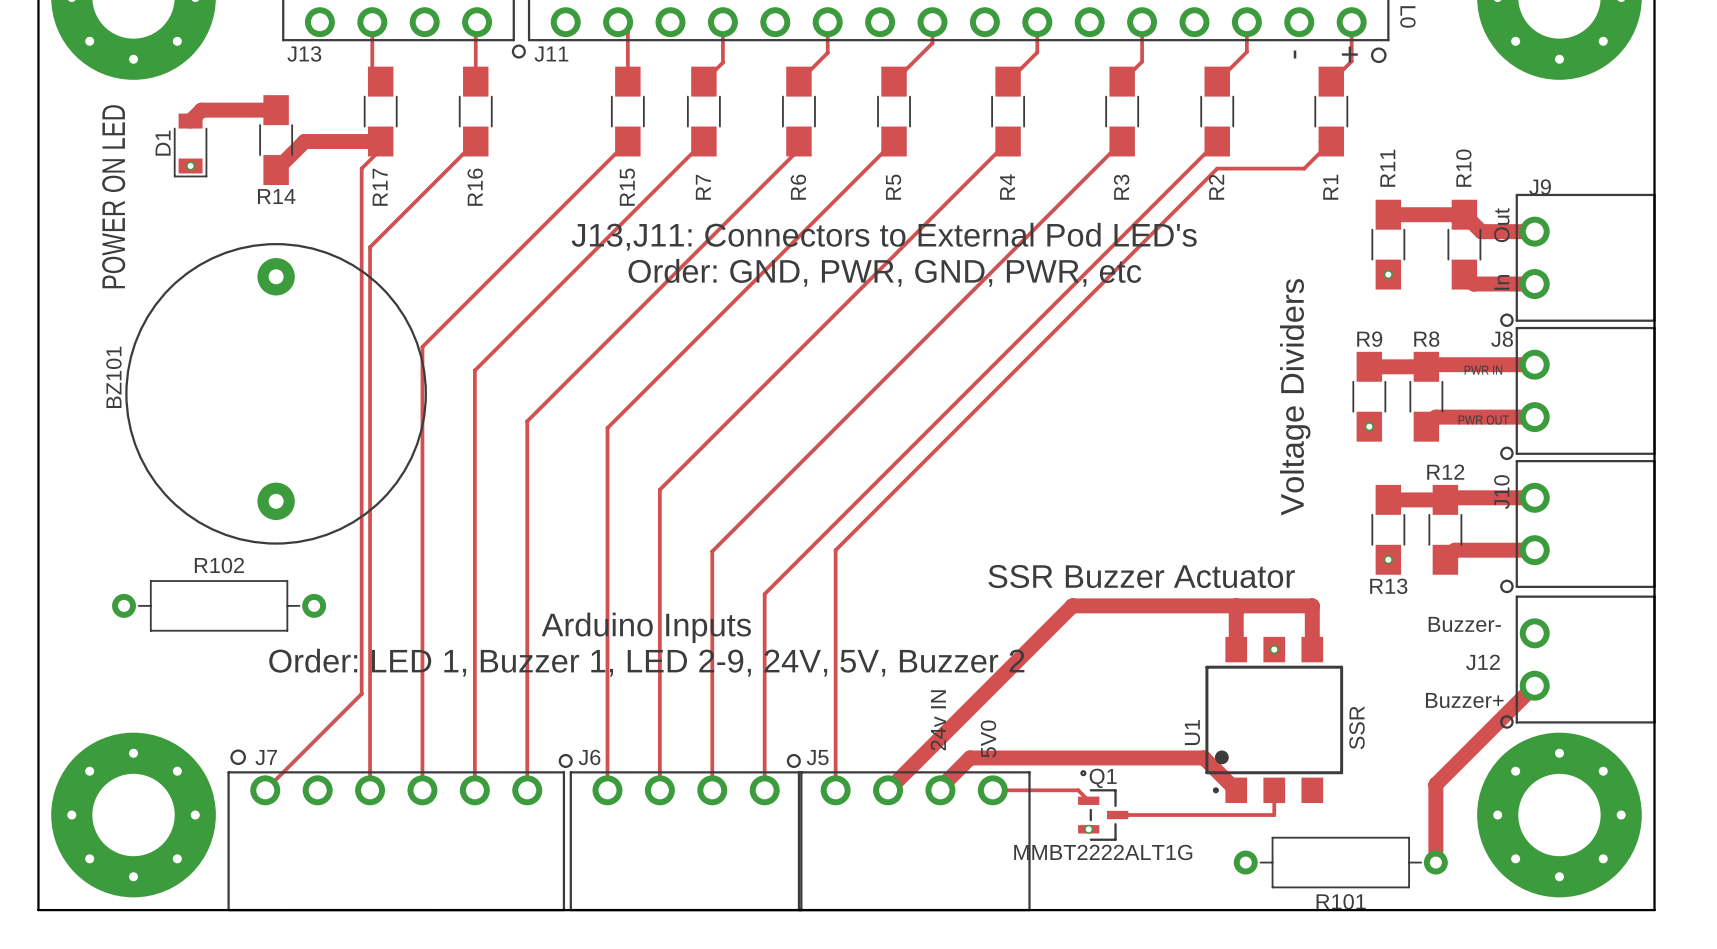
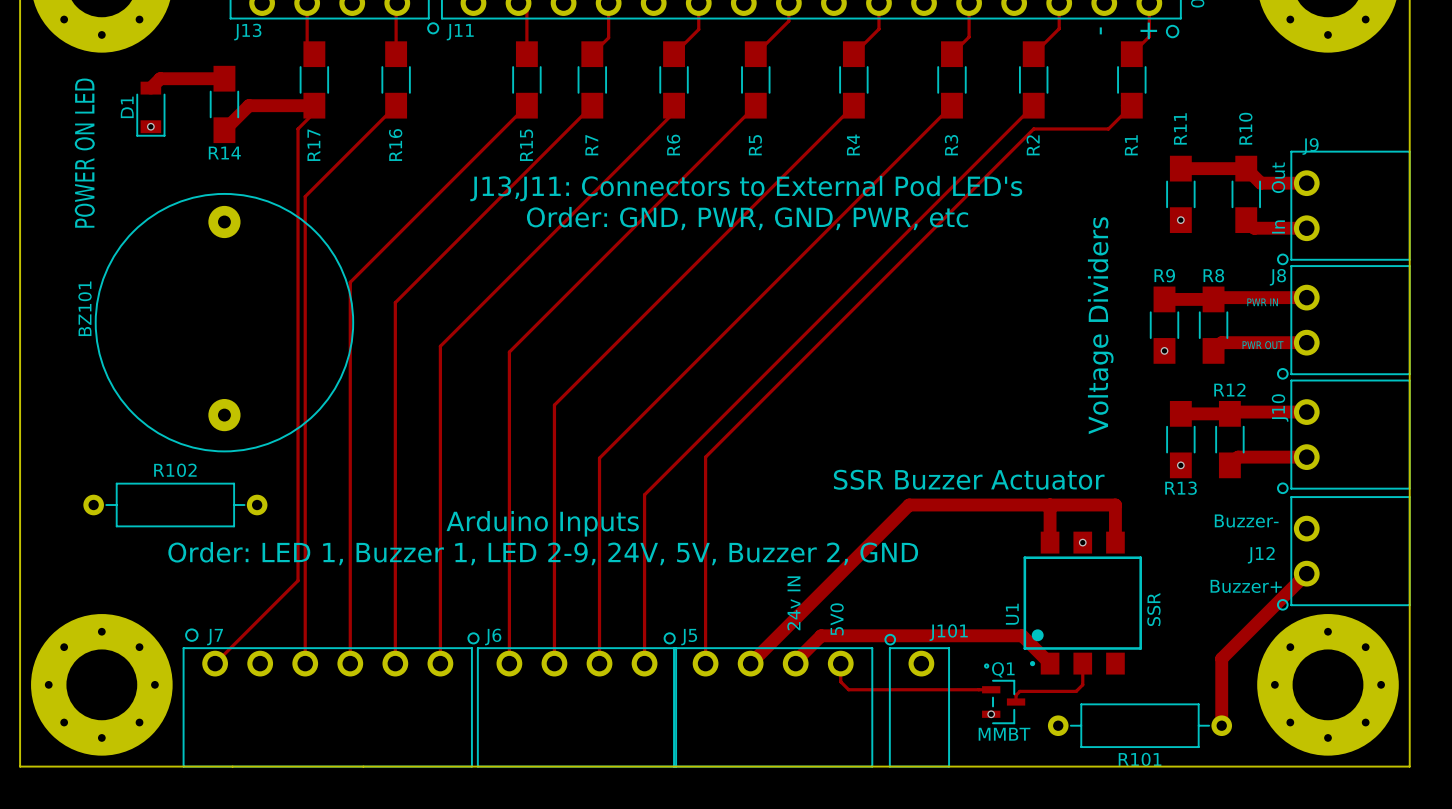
text: Order: LED 1, Buzzer 1, LED 2-9, 24V, 5V, Buzzer 2 (646, 662) -> Order: LED 1, Buzzer 1, LED 2-9, 24V, 5V, Buzzer 2, GND (543, 553)
track: (992, 790) (1078, 790) (1088, 800) -> (840, 663) (840, 681) (848, 689) (991, 689)
Q1 position: (1103, 805) -> (1003, 693)
track: (1117, 815) (1274, 815) -> (1016, 702) (1016, 695) (1019, 691) (1076, 691) (1082, 684)
via position: (1088, 829) -> (991, 714)
J101: none -> (917, 700)
Q1 value: MMBT2222ALT1G (1103, 852) -> MMBT (1004, 734)

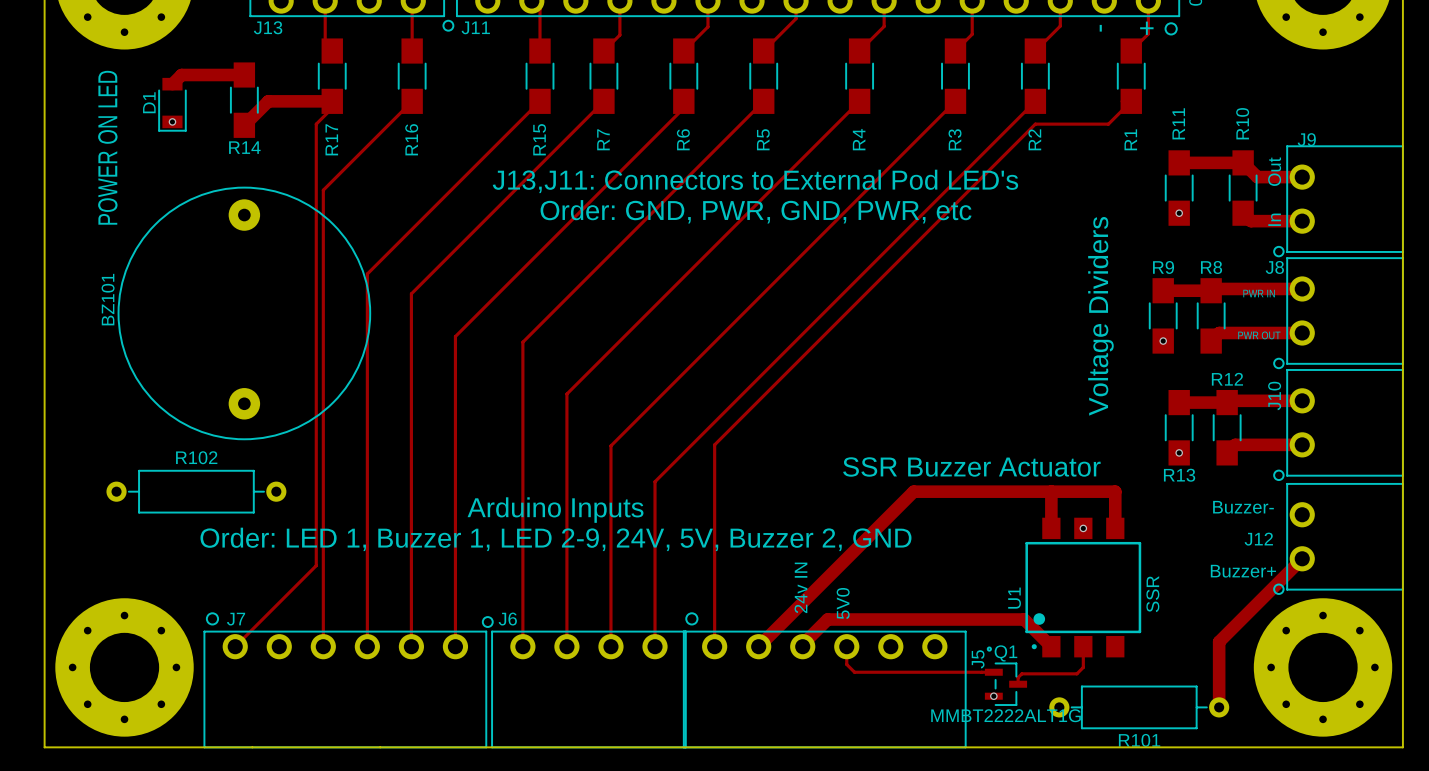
J5 footprint: [663, 632, 874, 768] -> [682, 612, 967, 749]
J5 name position: J5 (689, 637) -> J5 (978, 659)
J101: (917, 700) -> none
Q1 value: MMBT (1004, 734) -> MMBT2222ALT1G (1006, 715)

